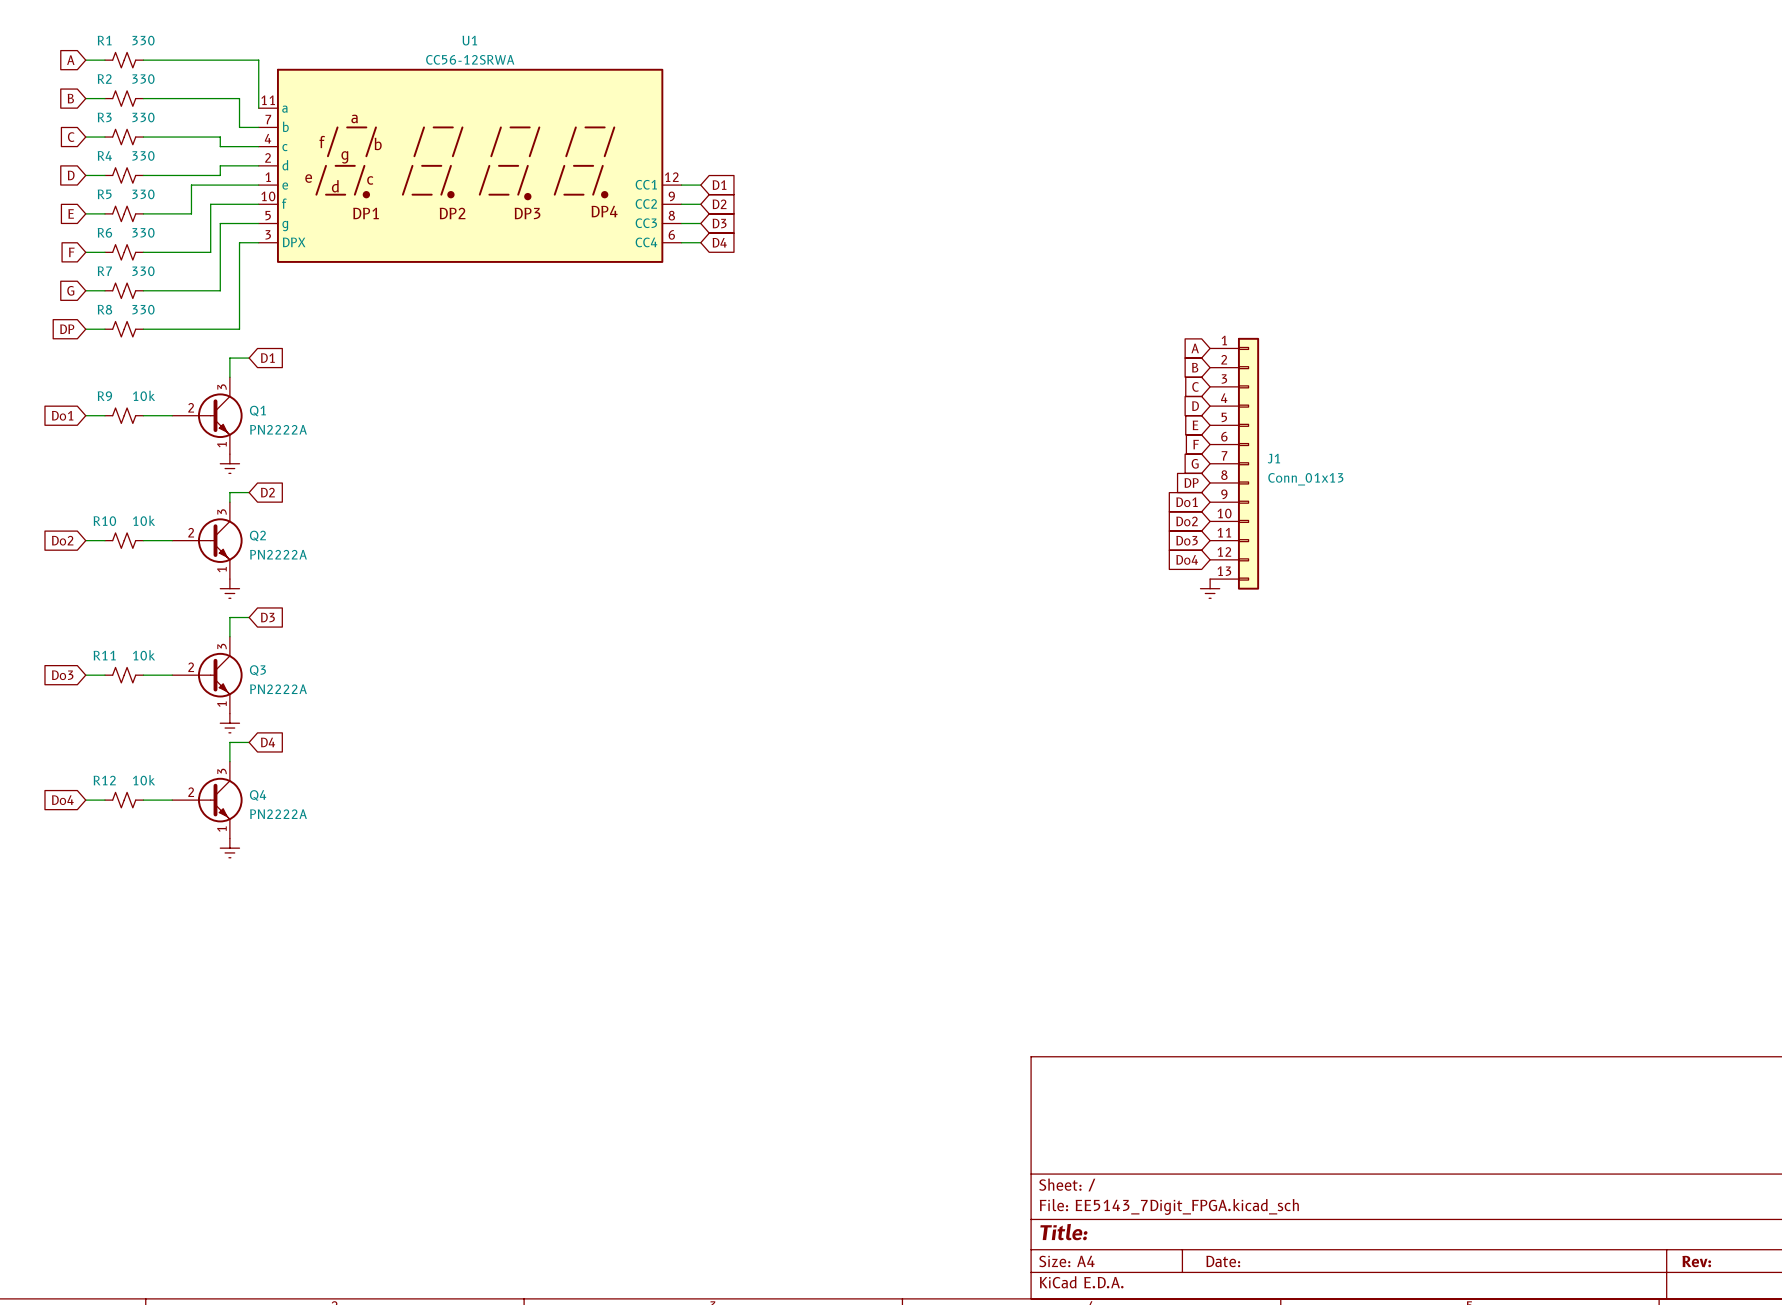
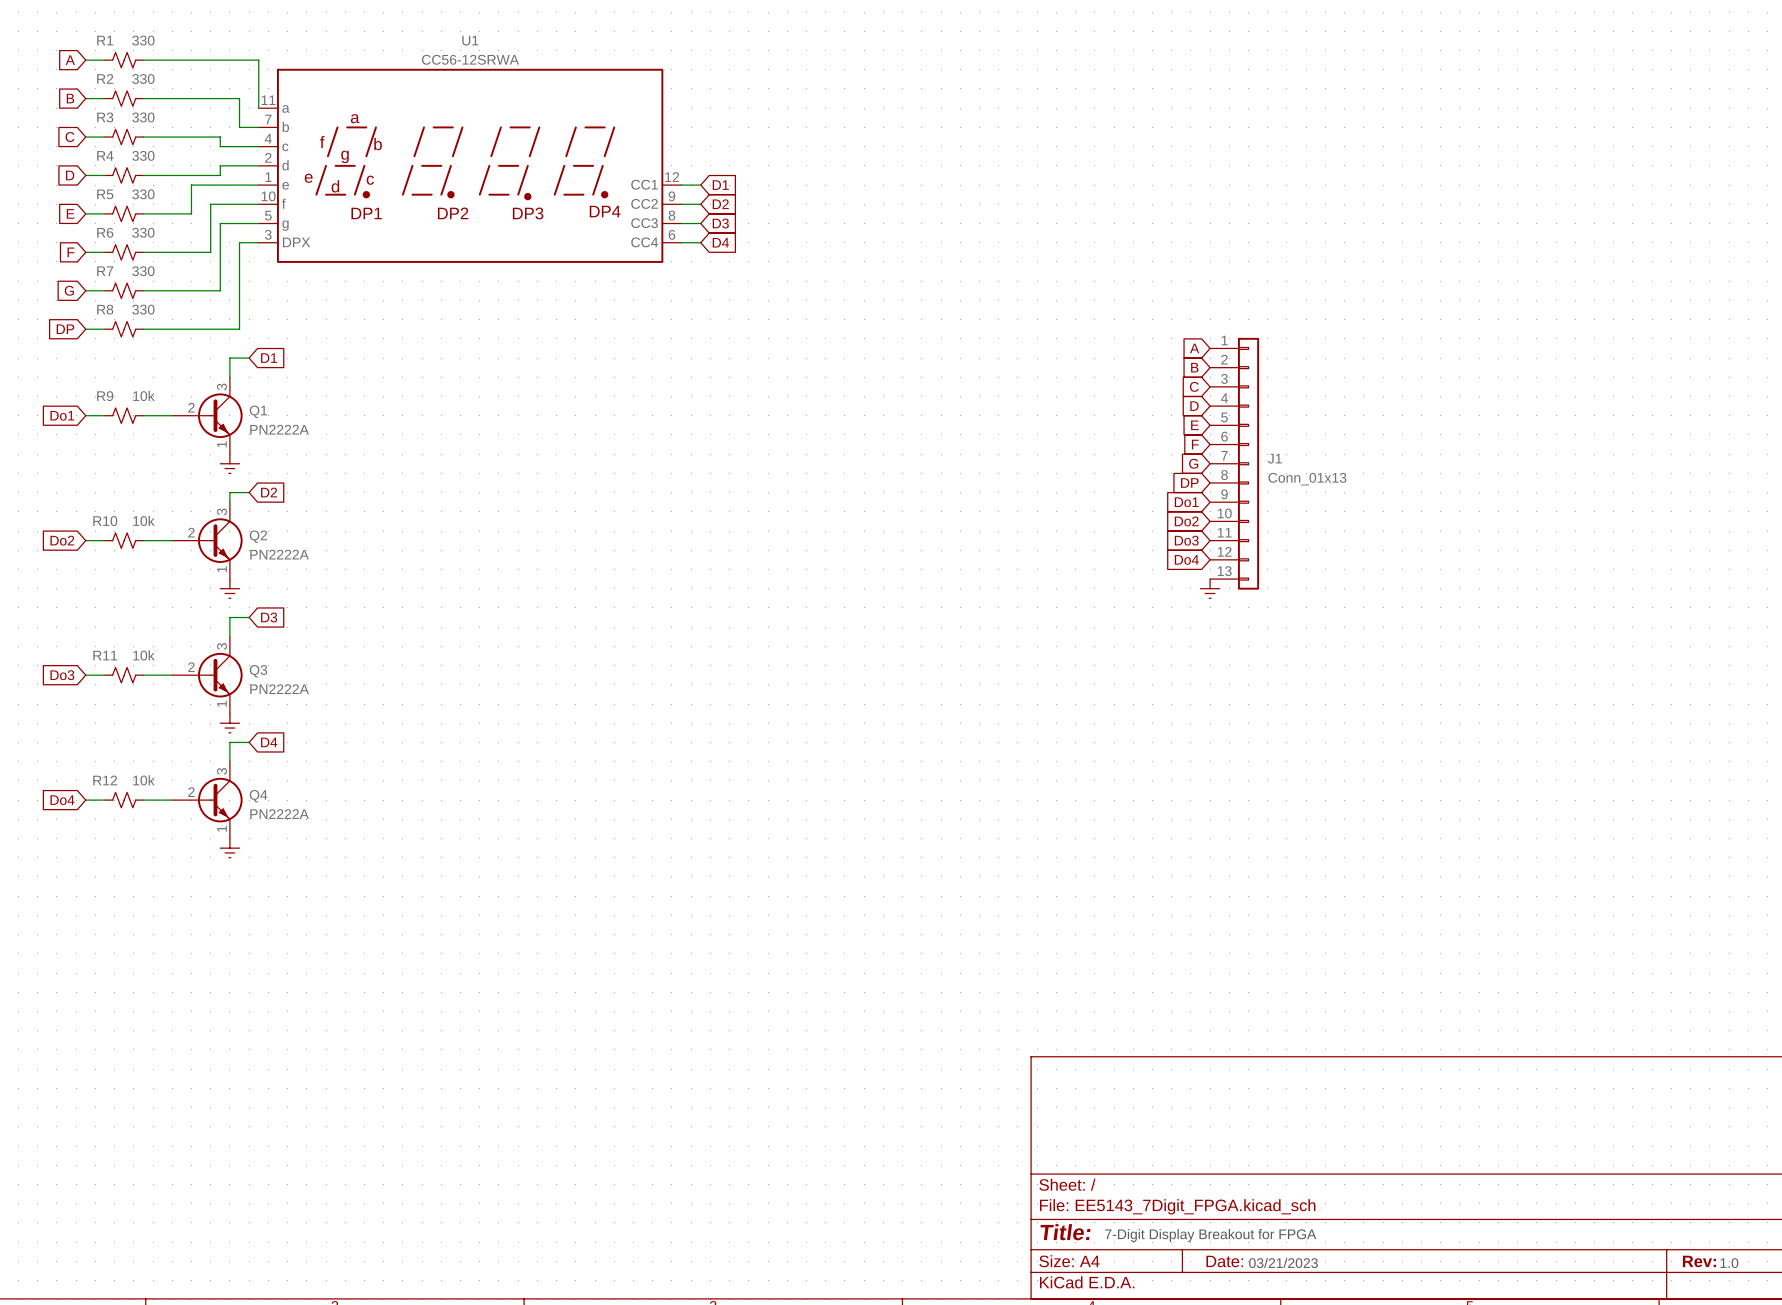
text: none -> 7-Digit Display Breakout for FPGA (1210, 1235)
text: none -> 03/21/2023 (1283, 1262)
text: none -> 1.0 (1729, 1263)

